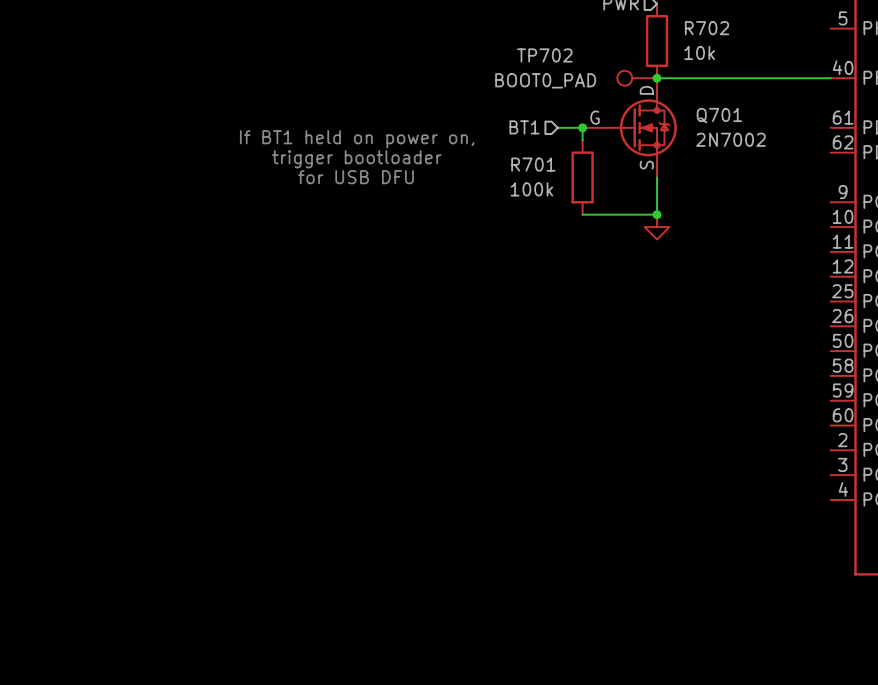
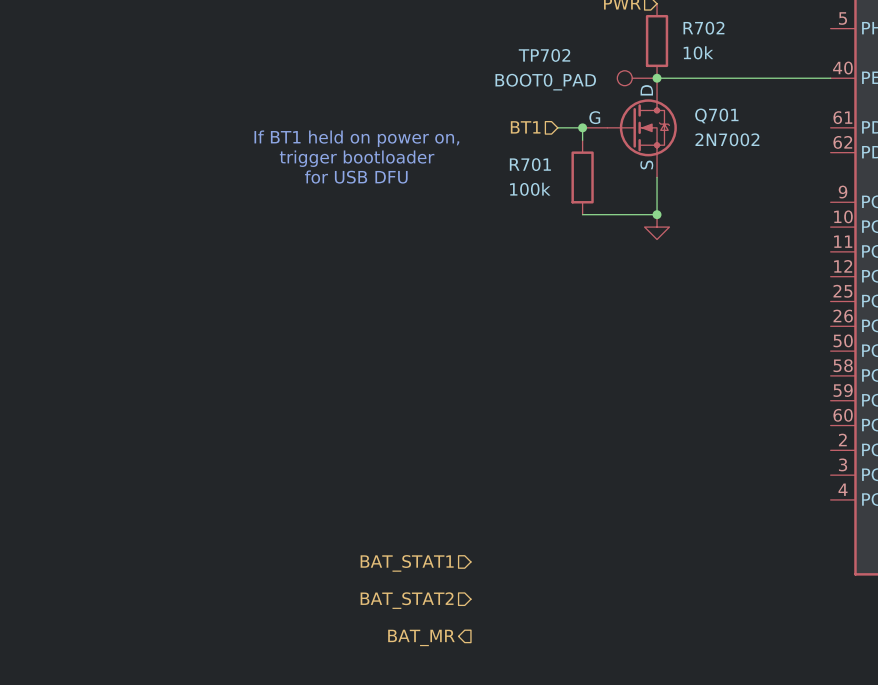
hierarchical label: none -> BAT_STAT1 (407, 563)
hierarchical label: none -> BAT_STAT2 (407, 600)
hierarchical label: none -> BAT_MR (421, 637)

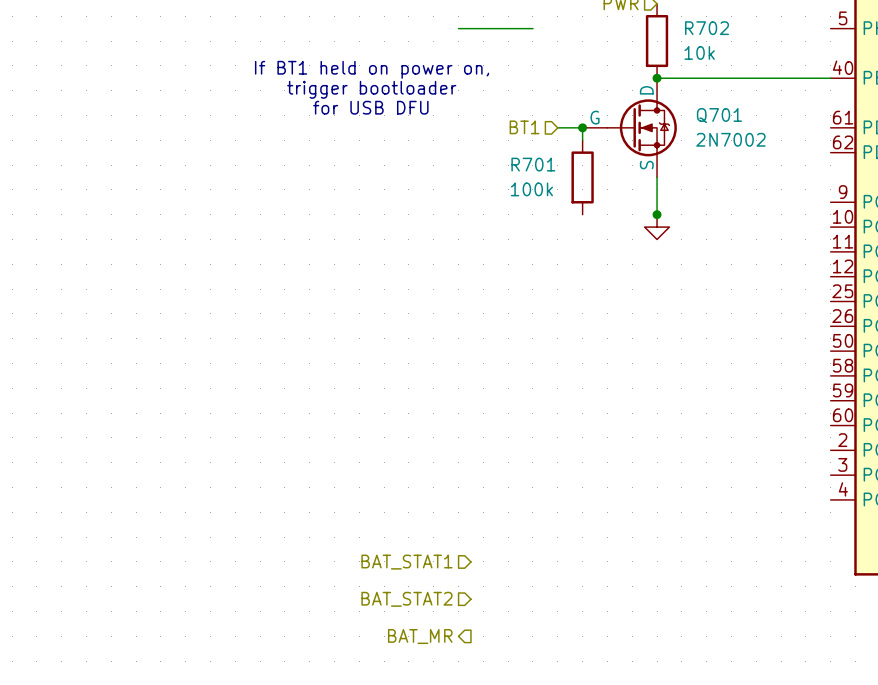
TP702: BOOT0_PAD (637, 78) -> none
text position: If BT1 held on power on, (356, 138) -> If BT1 held on power on, (372, 69)
text position: trigger bootloader (357, 158) -> trigger bootloader (371, 89)
text position: for USB DFU (356, 177) -> for USB DFU (370, 107)
wire: (582, 214) (657, 214) -> (458, 28) (532, 28)

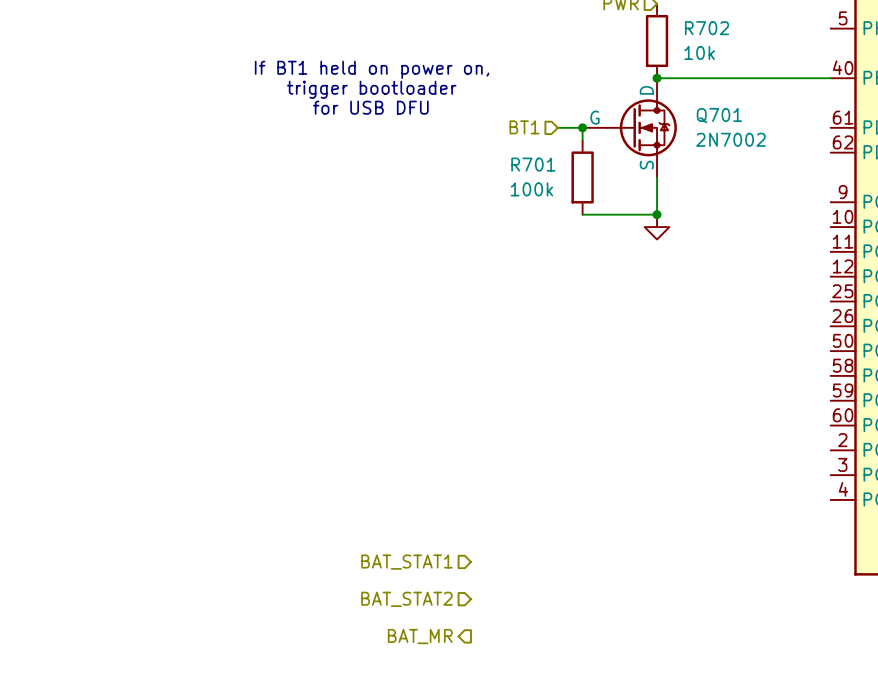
wire: (458, 28) (532, 28) -> (582, 214) (657, 214)

